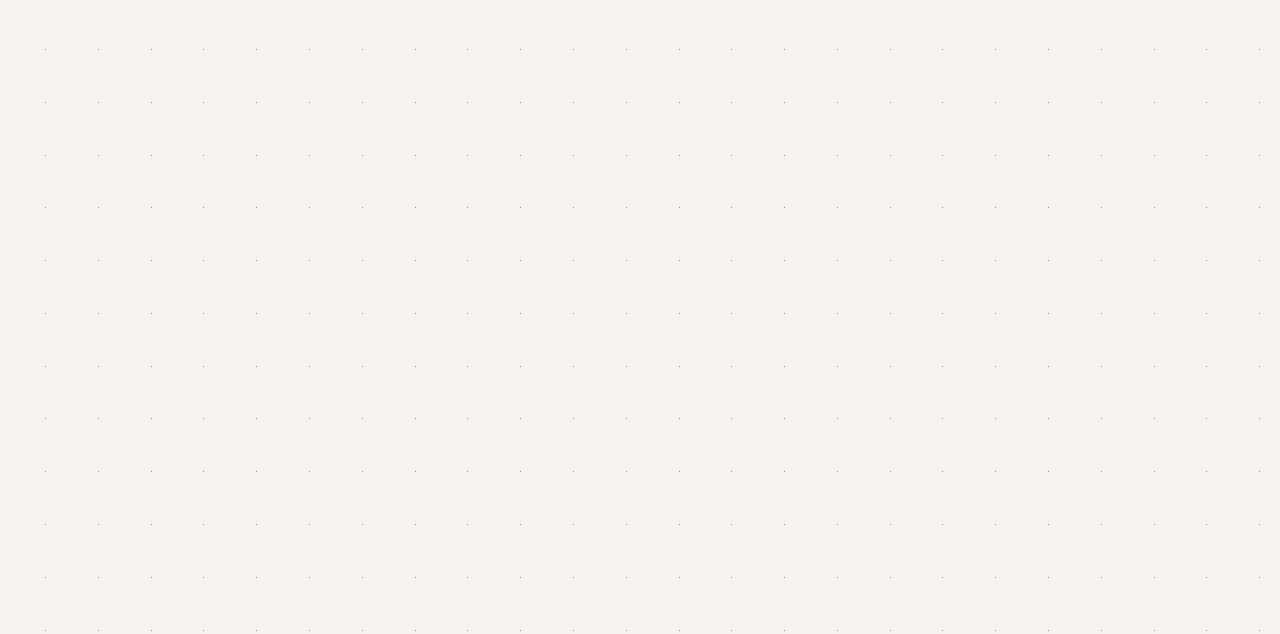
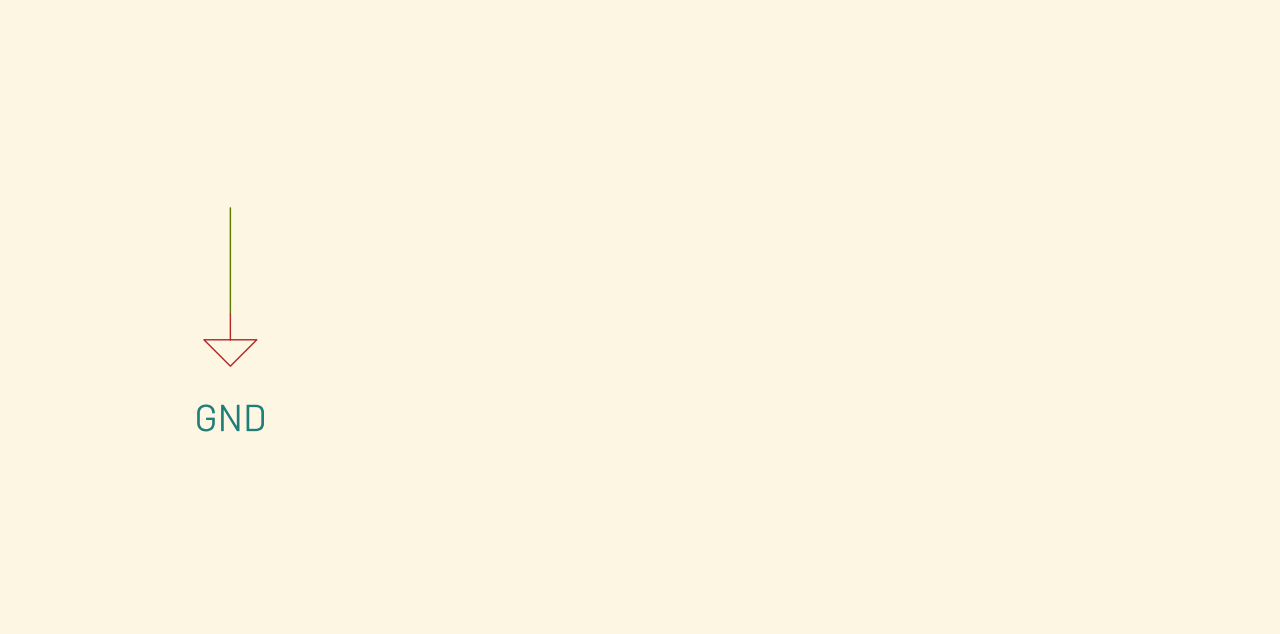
wire: none -> (230, 207) (230, 313)
power symbol: none -> GND (230, 339)

